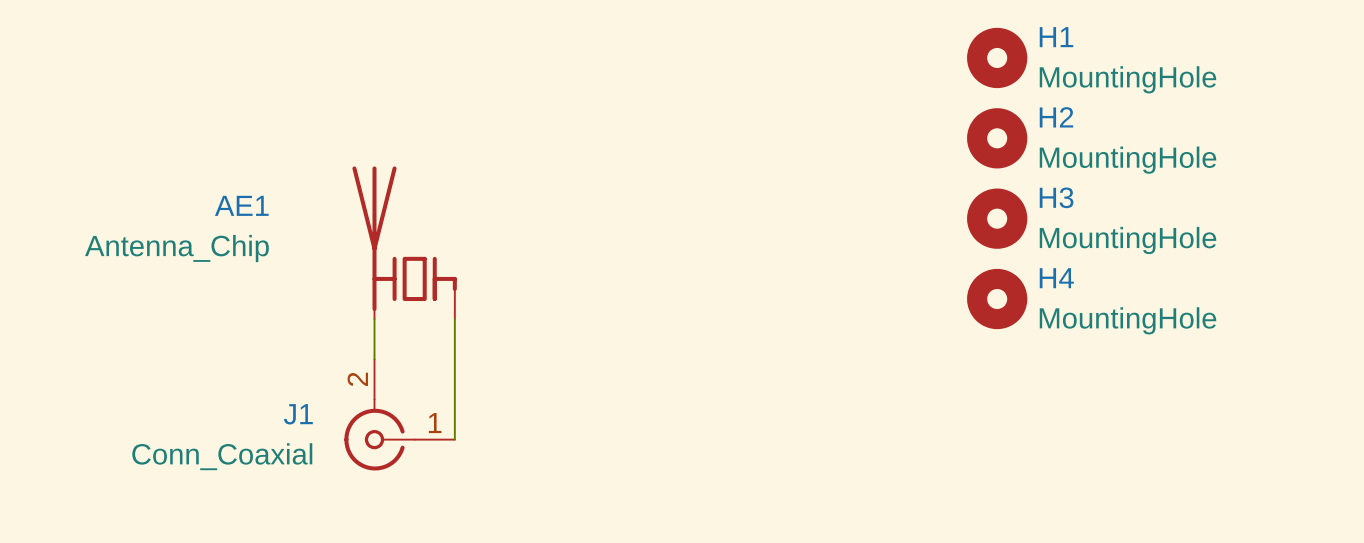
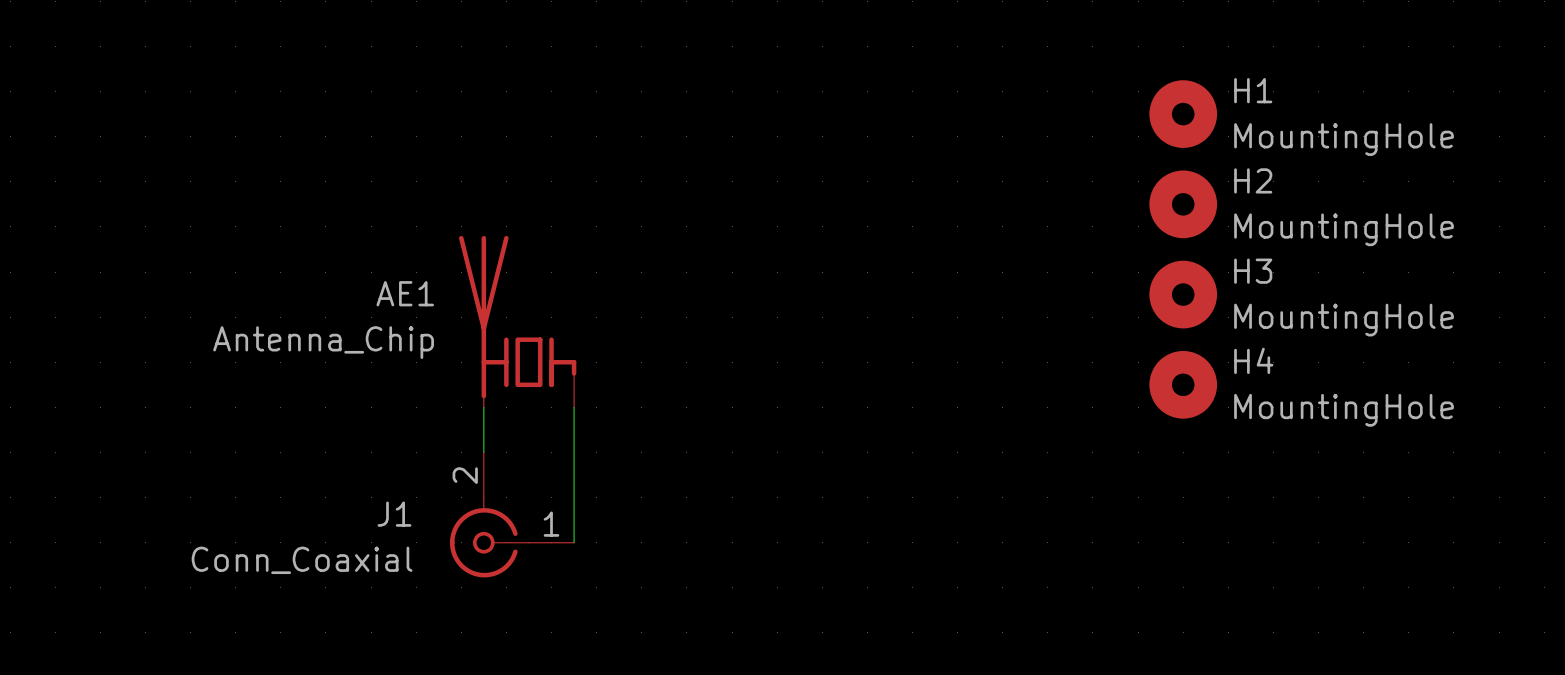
AE1 name position: AE1 (241, 205) -> AE1 (405, 293)
AE1 value position: Antenna_Chip (176, 248) -> Antenna_Chip (323, 342)

